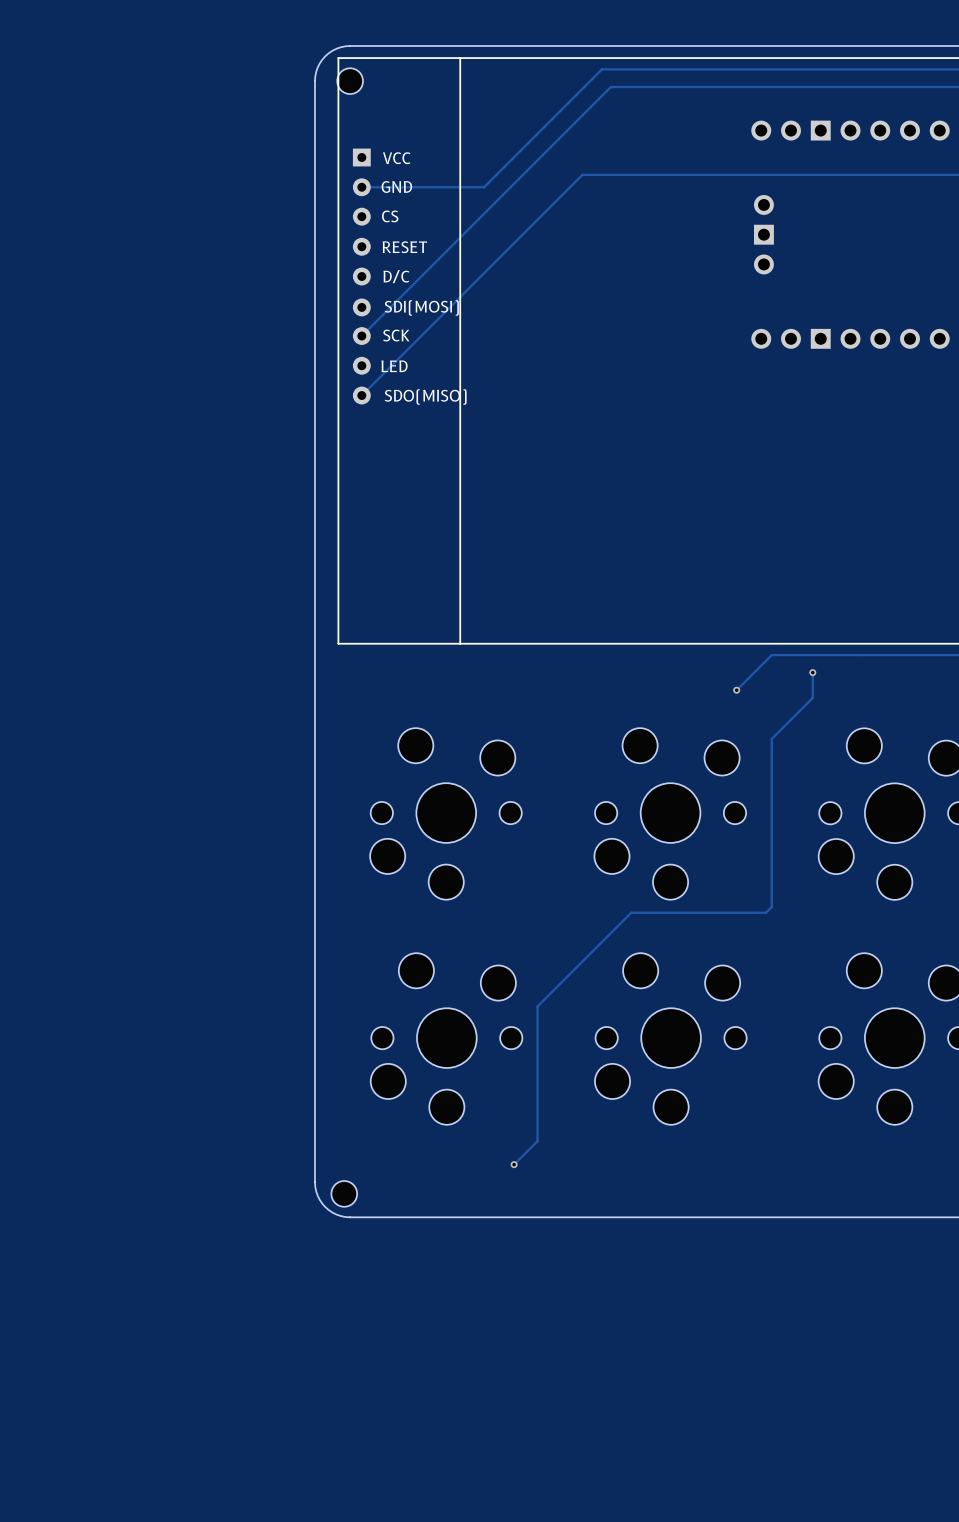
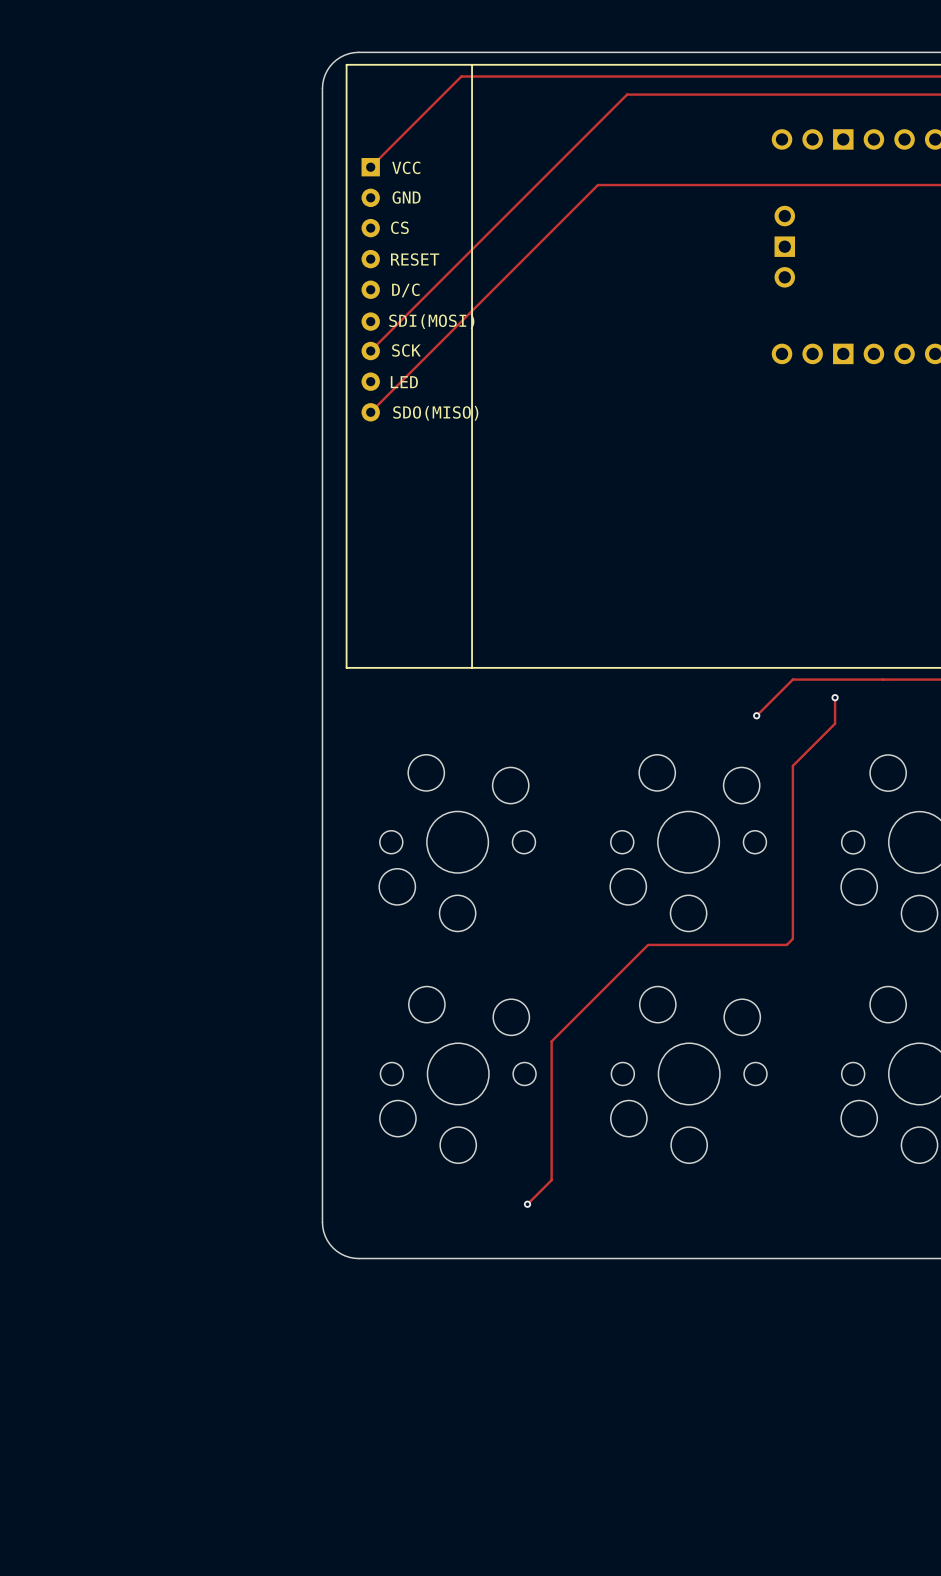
track: (601, 69) (484, 187) (361, 187) -> (617, 76) (461, 76) (370, 167)
part: (350, 81) -> none
part: (344, 1193) -> none

